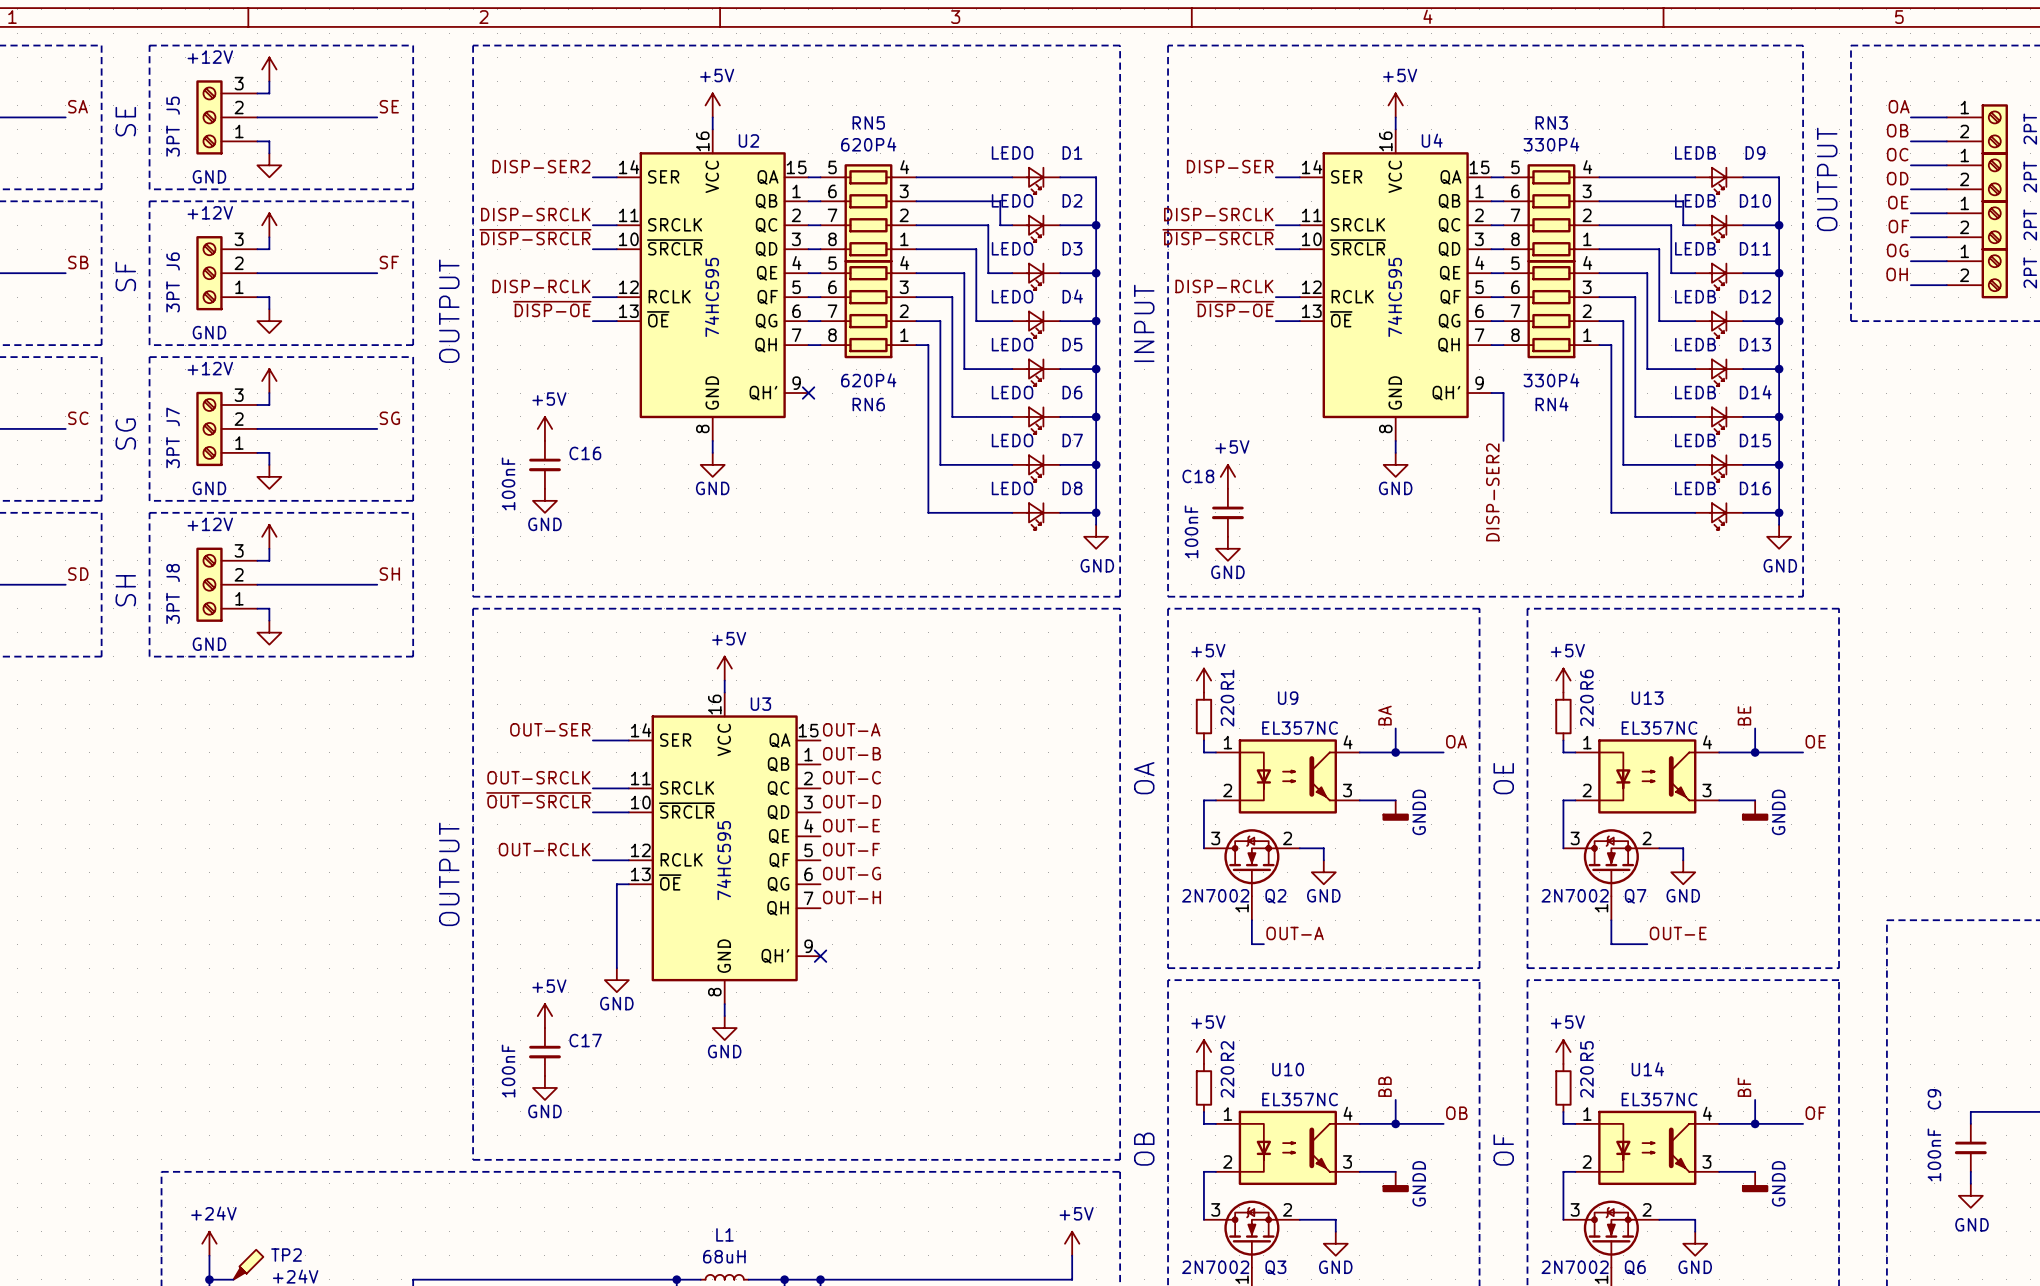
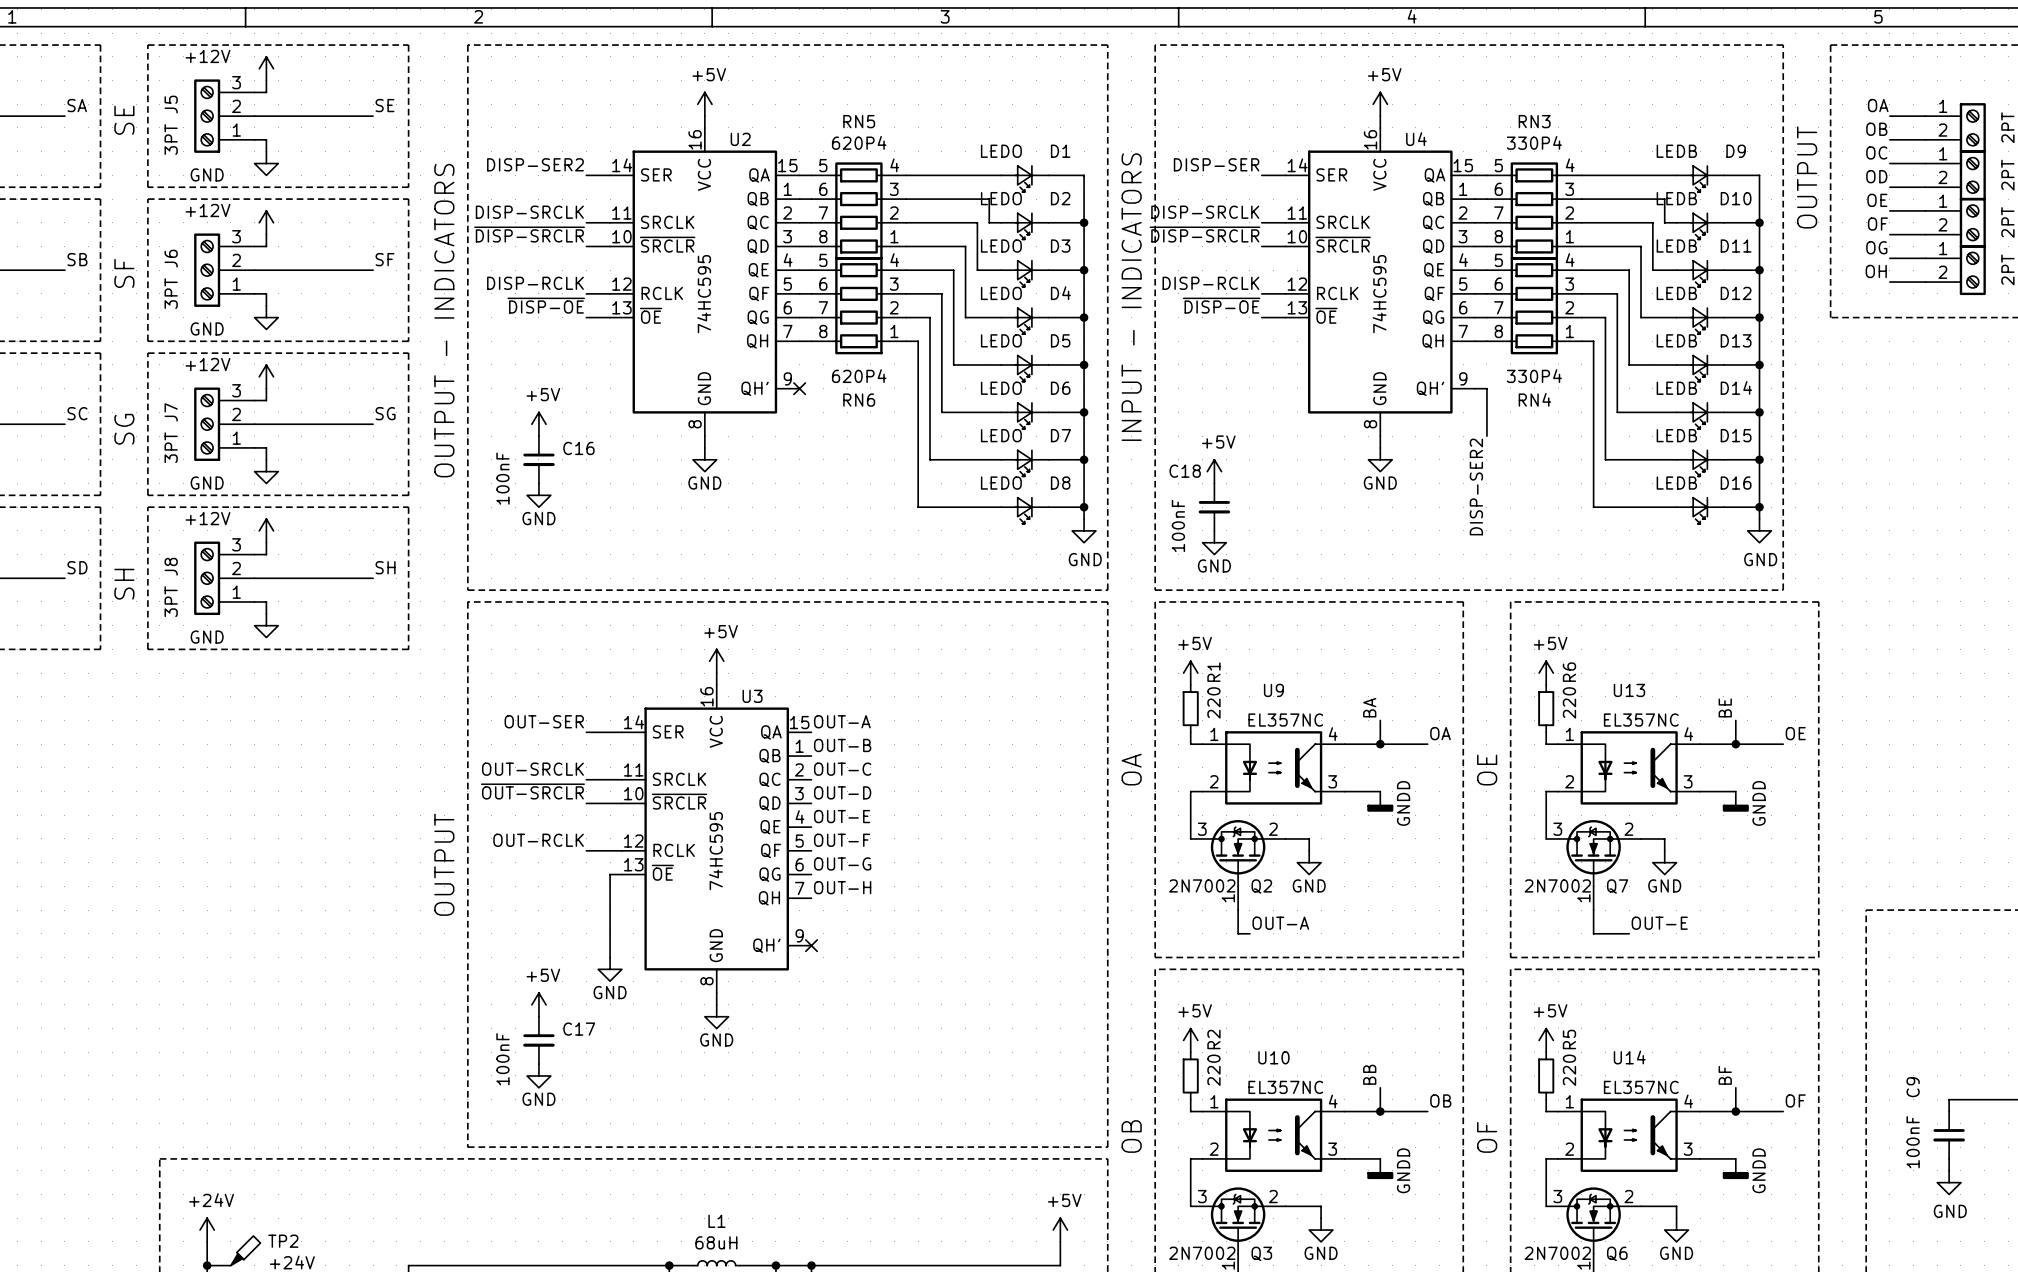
text: none -> INPUT - INDICATORS (1131, 297)
text: OUTPUT (449, 311) -> none
text: INPUT (1144, 323) -> none
text: none -> OUTPUT - INDICATORS (444, 320)

